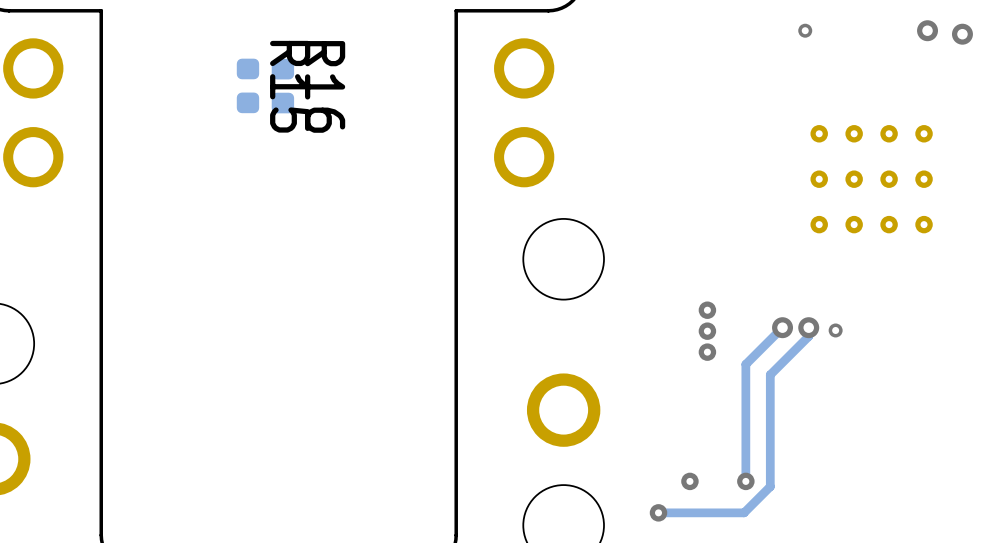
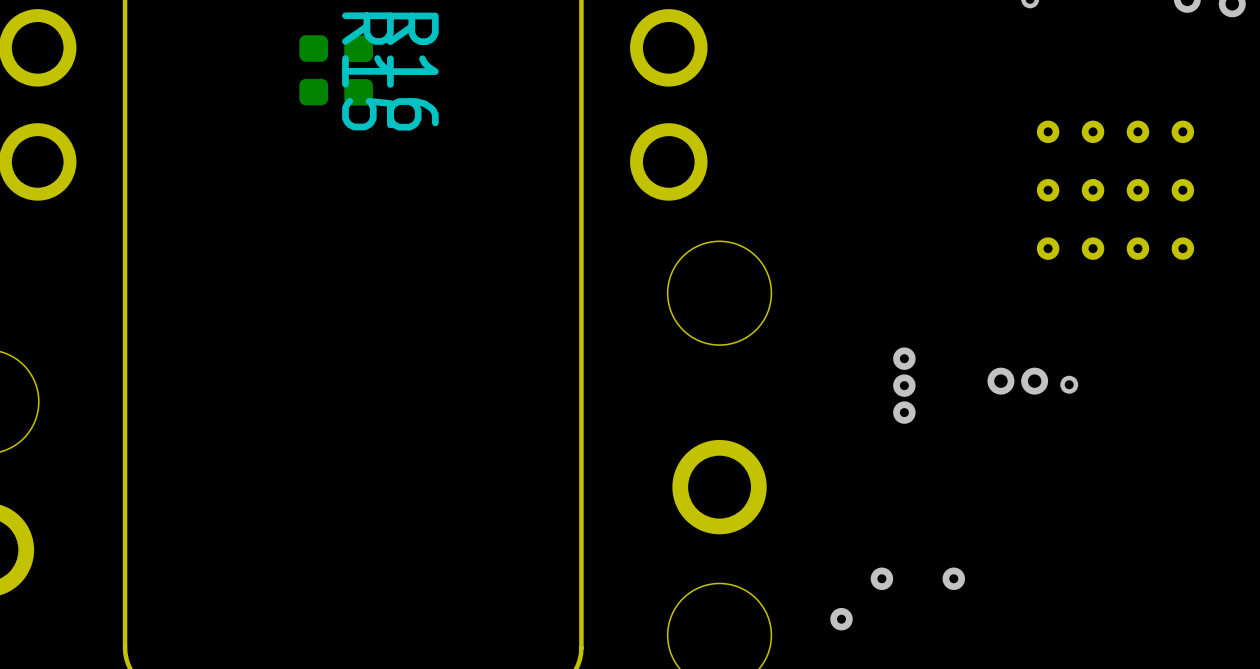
track: (782, 327) (745, 364) (745, 481) -> none
track: (808, 327) (808, 336) (770, 374) (770, 486) (744, 512) (658, 512) -> none

